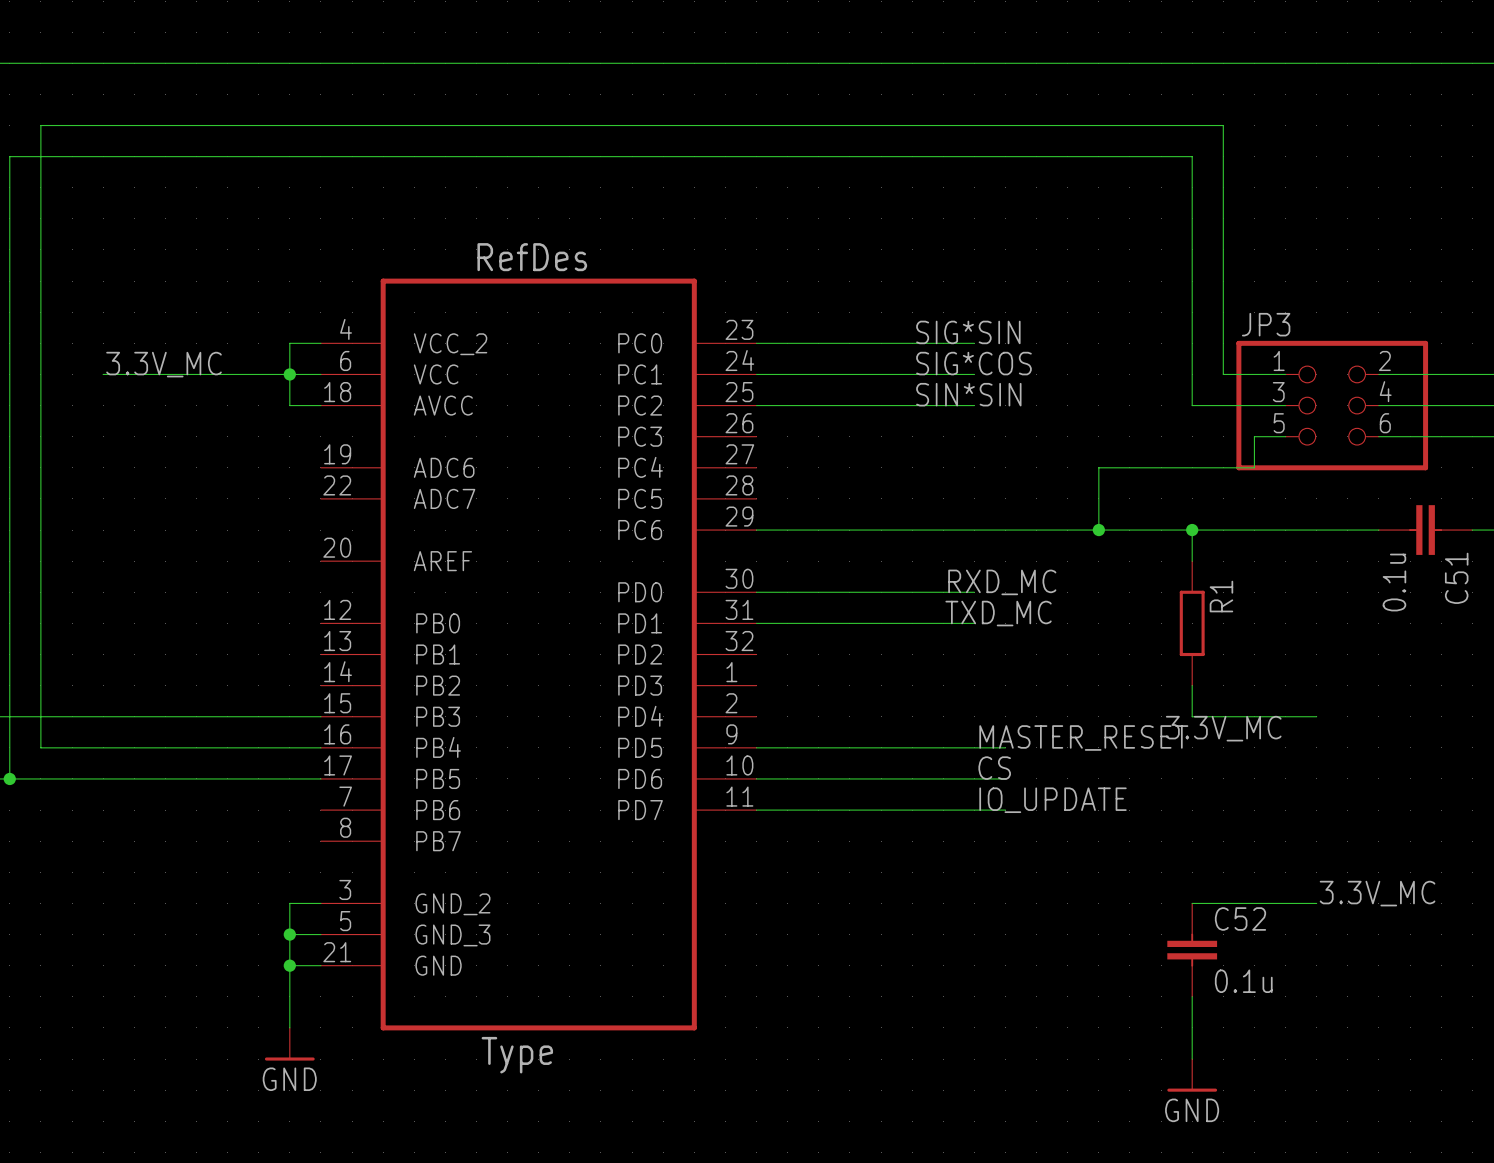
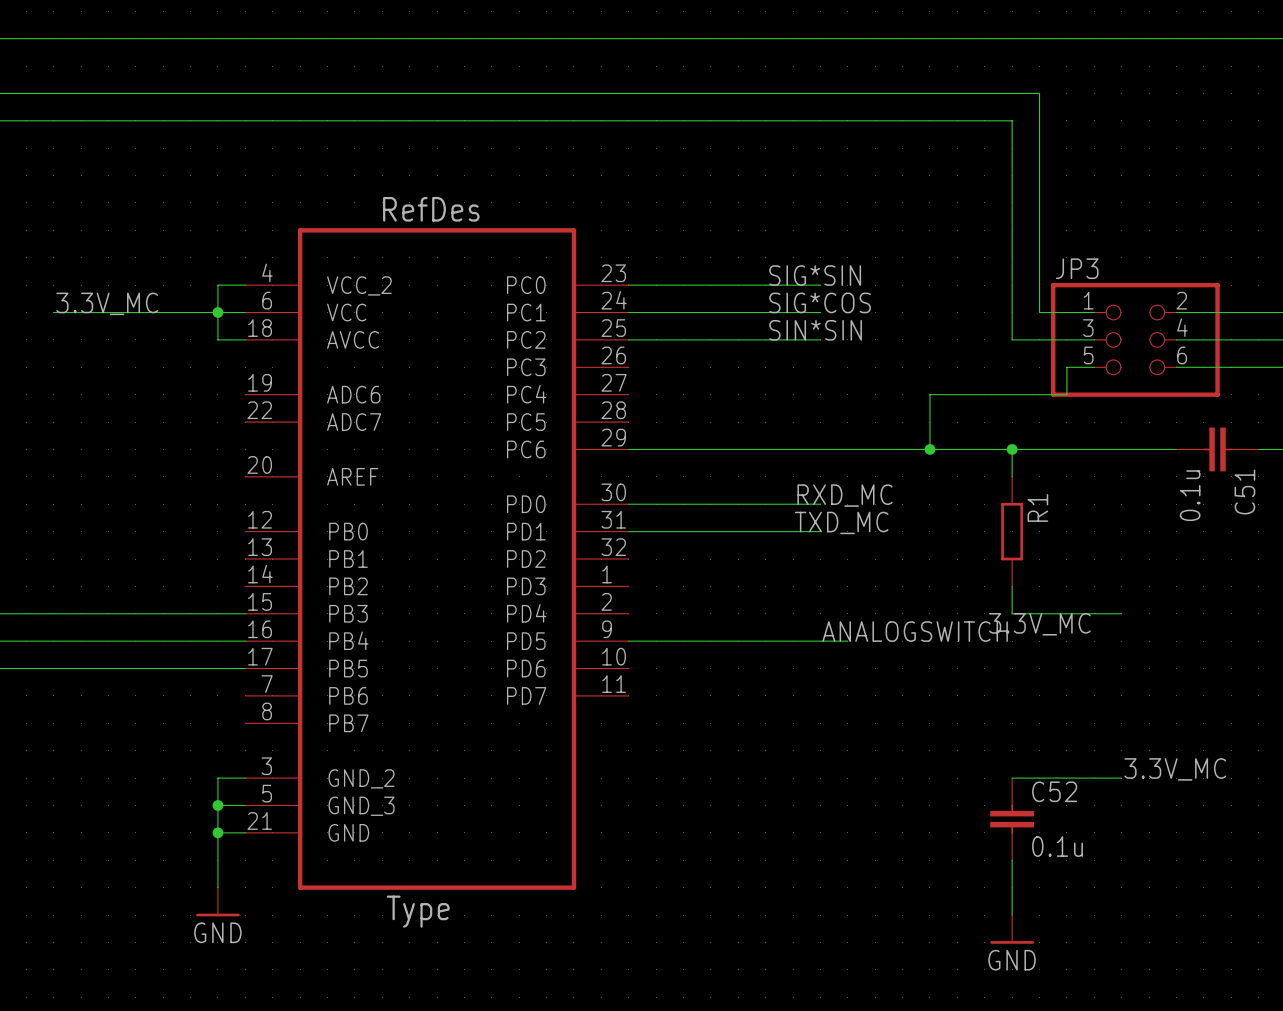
label: MASTER_RESET (1083, 738) -> ANALOGSWITCH (915, 631)
label: CS (994, 768) -> none
wire: (756, 778) (1005, 778) -> none
label: IO_UPDATE (1053, 800) -> none
wire: (756, 810) (1005, 810) -> none

